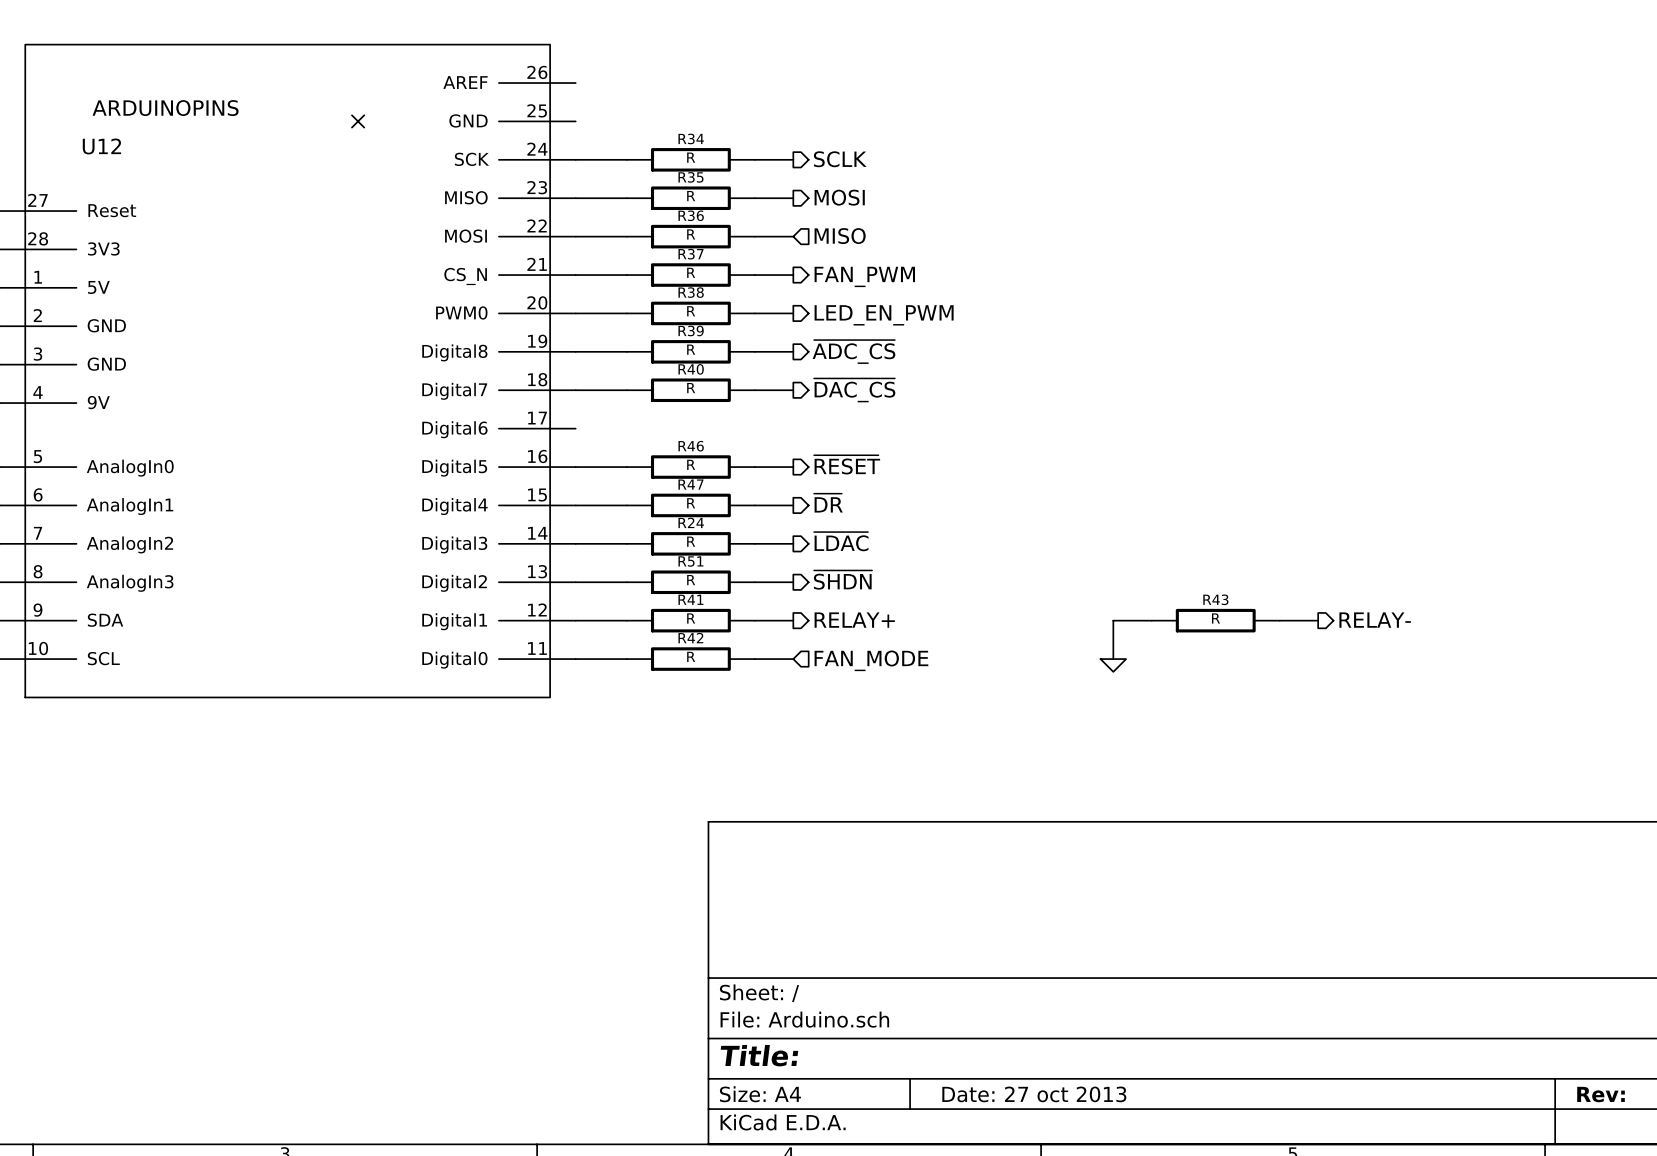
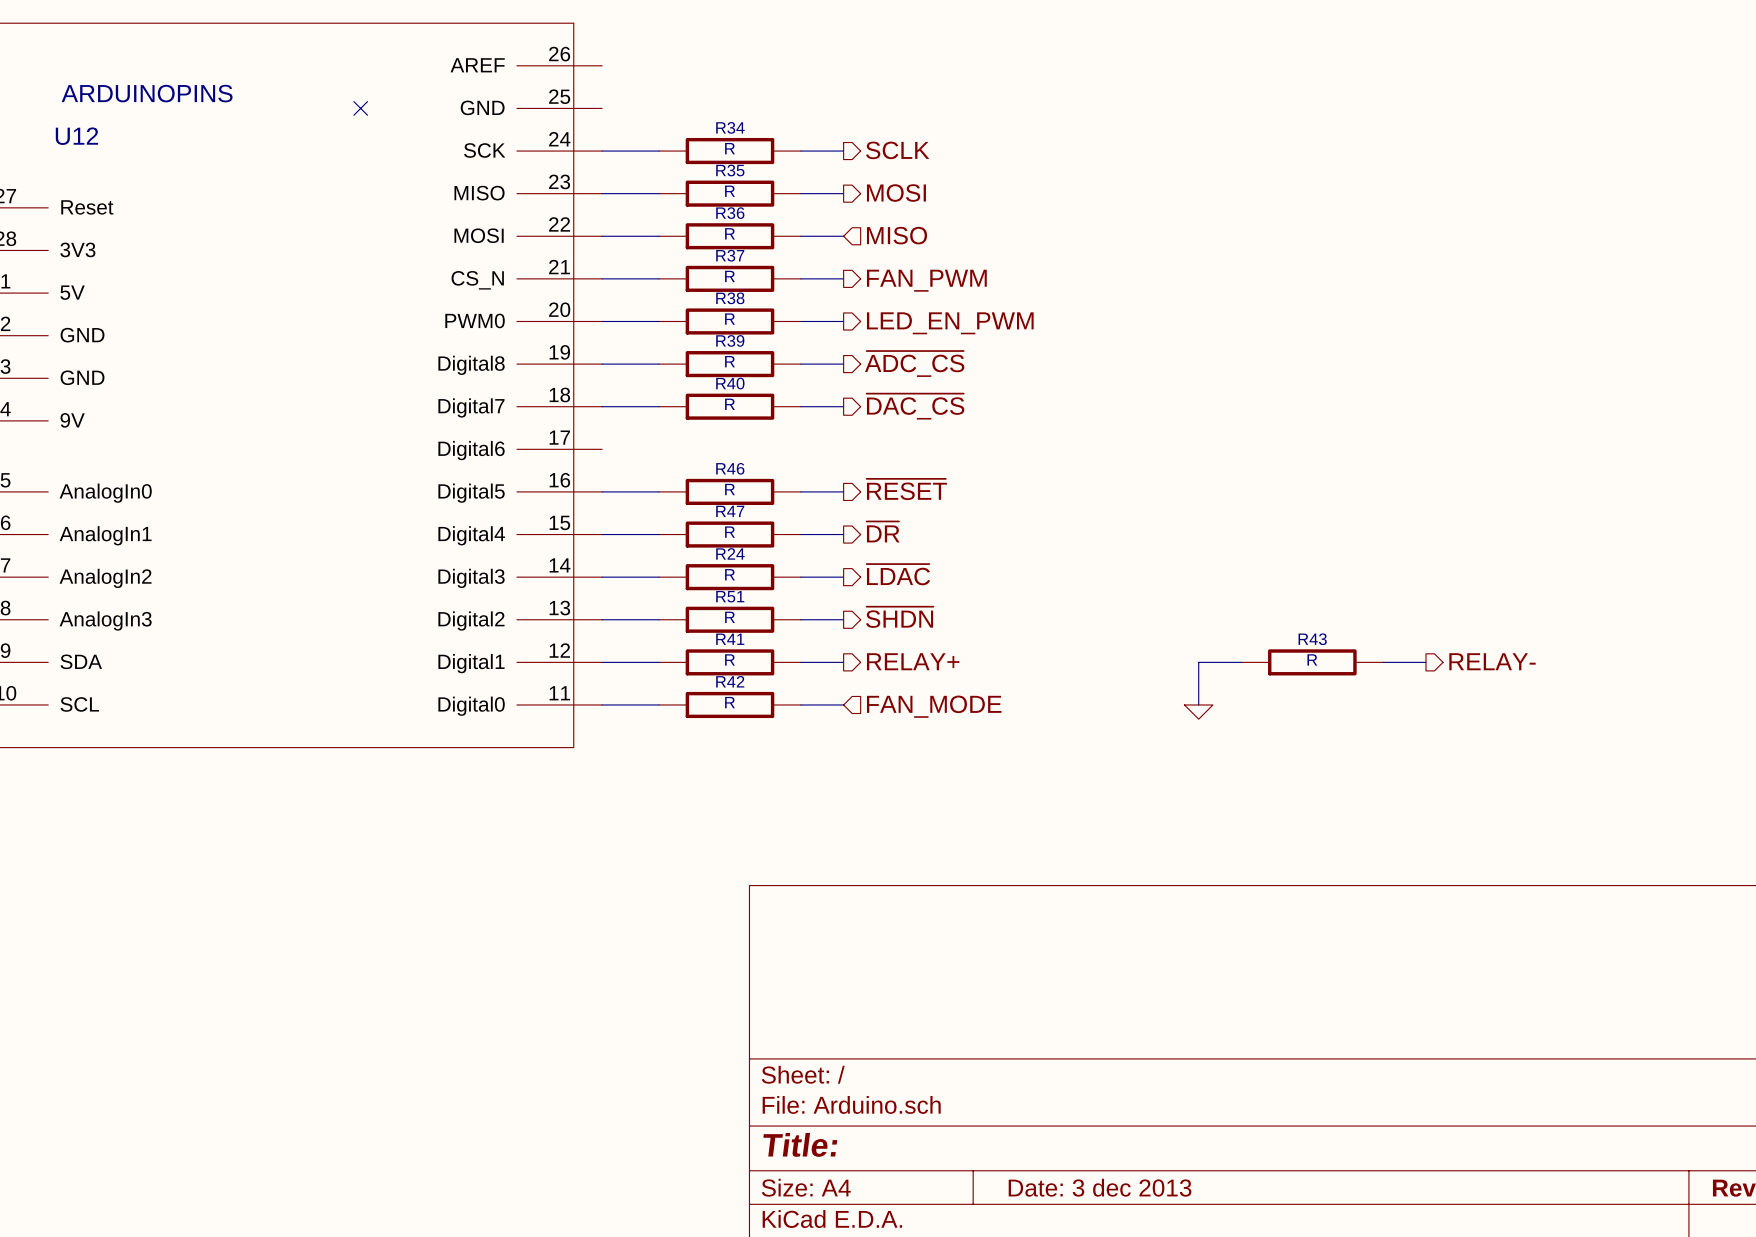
title block: Date: 27 oct 2013 (1034, 1094) -> Date: 3 dec 2013 (1100, 1187)

